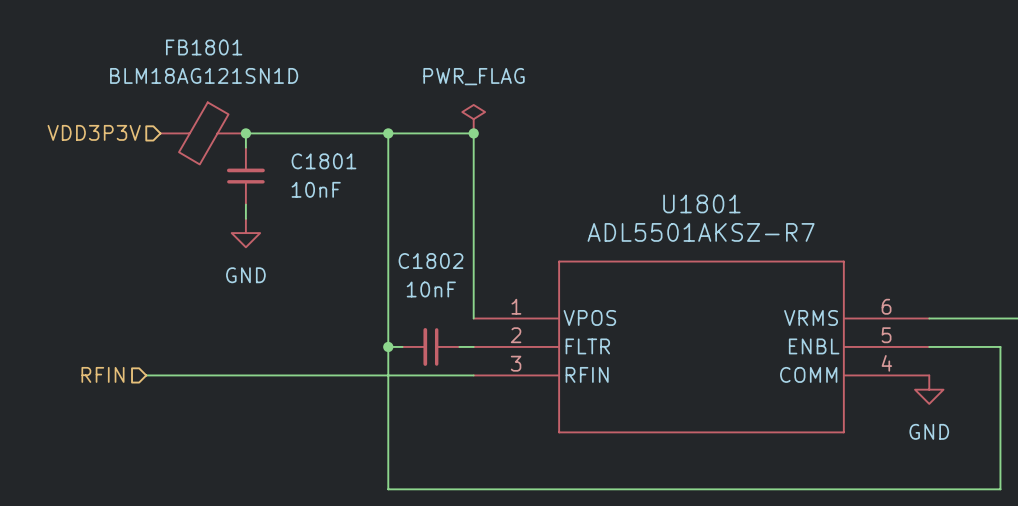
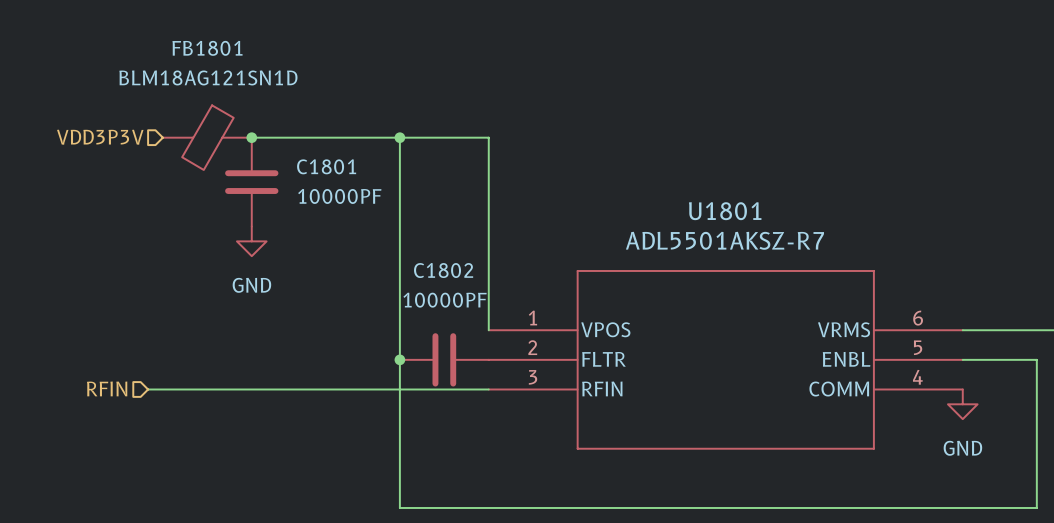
power symbol: PWR_FLAG (473, 119) -> none
junction: (473, 133) -> none
C1801 symbol: [226, 147, 265, 205] -> [225, 137, 279, 227]
C1801 value: 10nF (316, 189) -> 10000PF (339, 196)
C1802 value: 10nF (431, 289) -> 10000PF (445, 300)
C1802 symbol: [402, 328, 460, 366] -> [399, 333, 489, 387]

